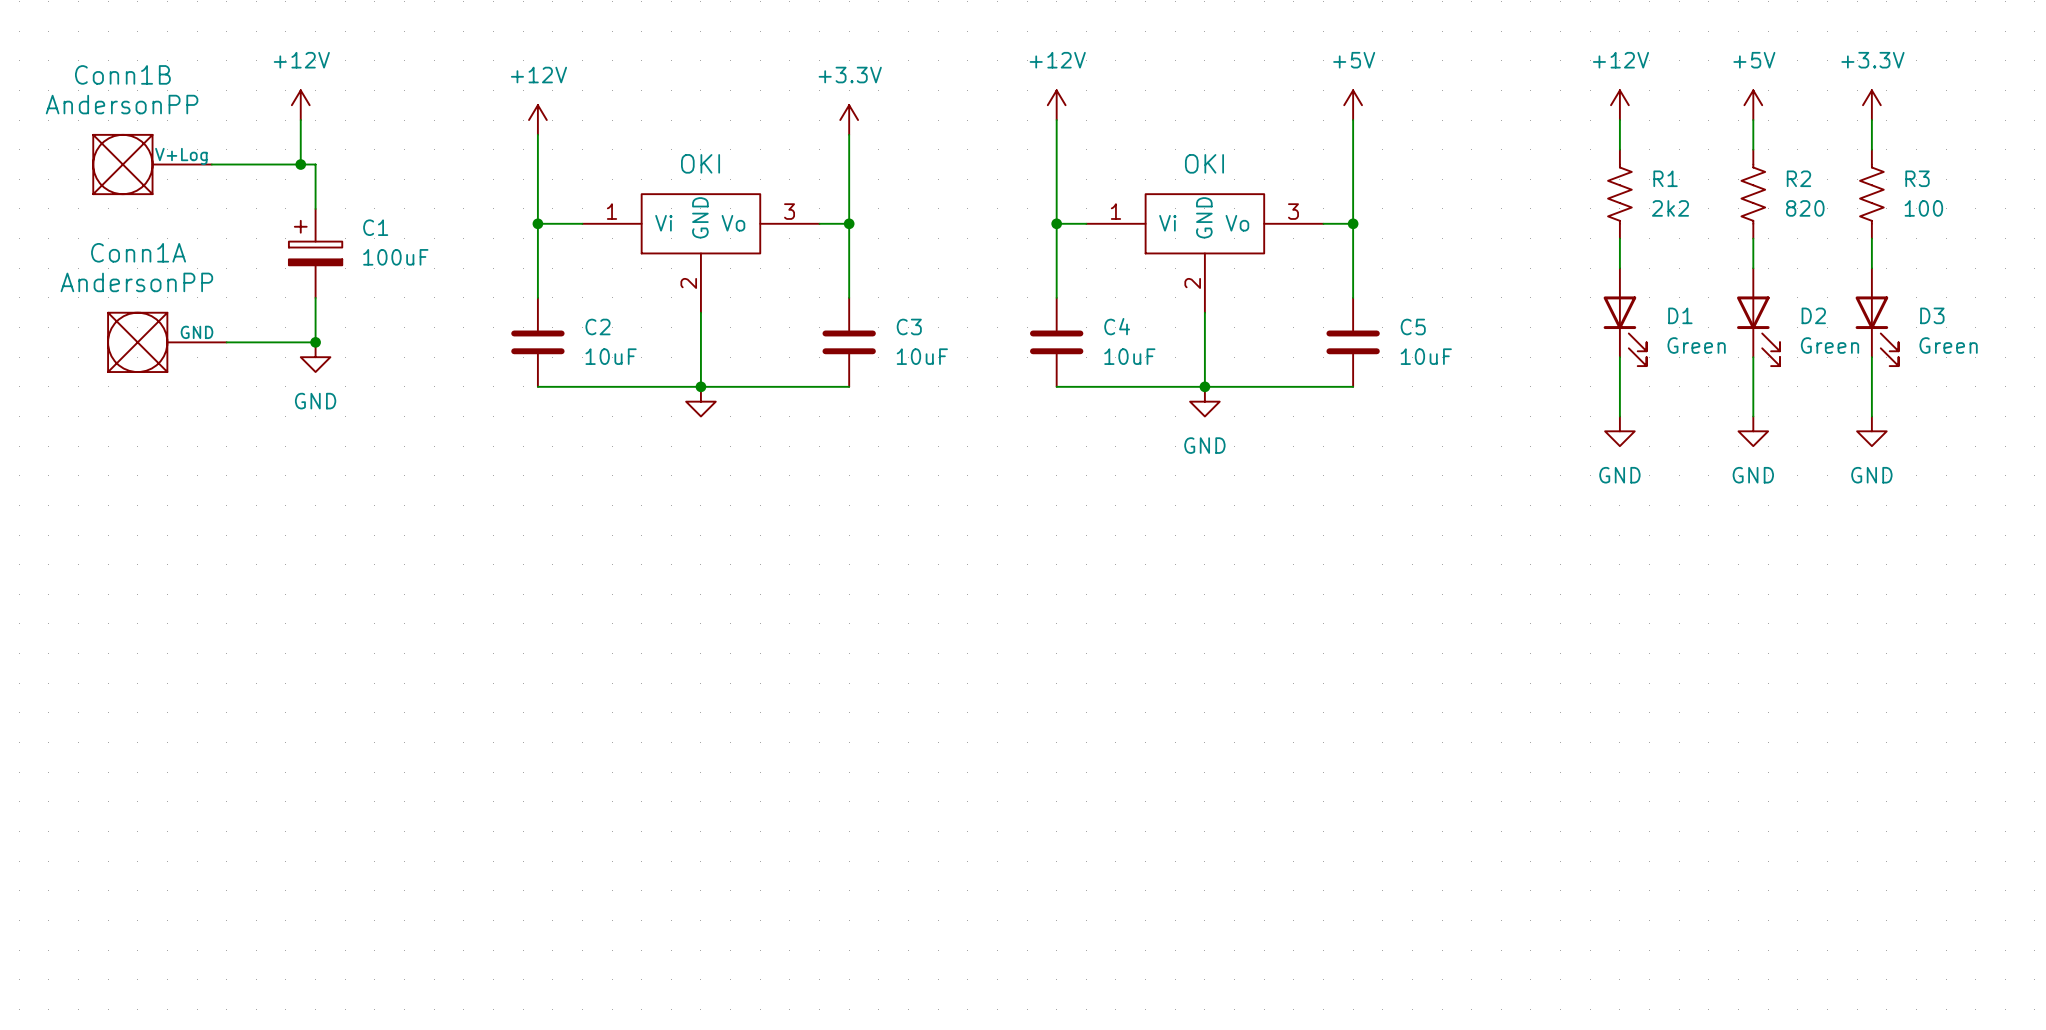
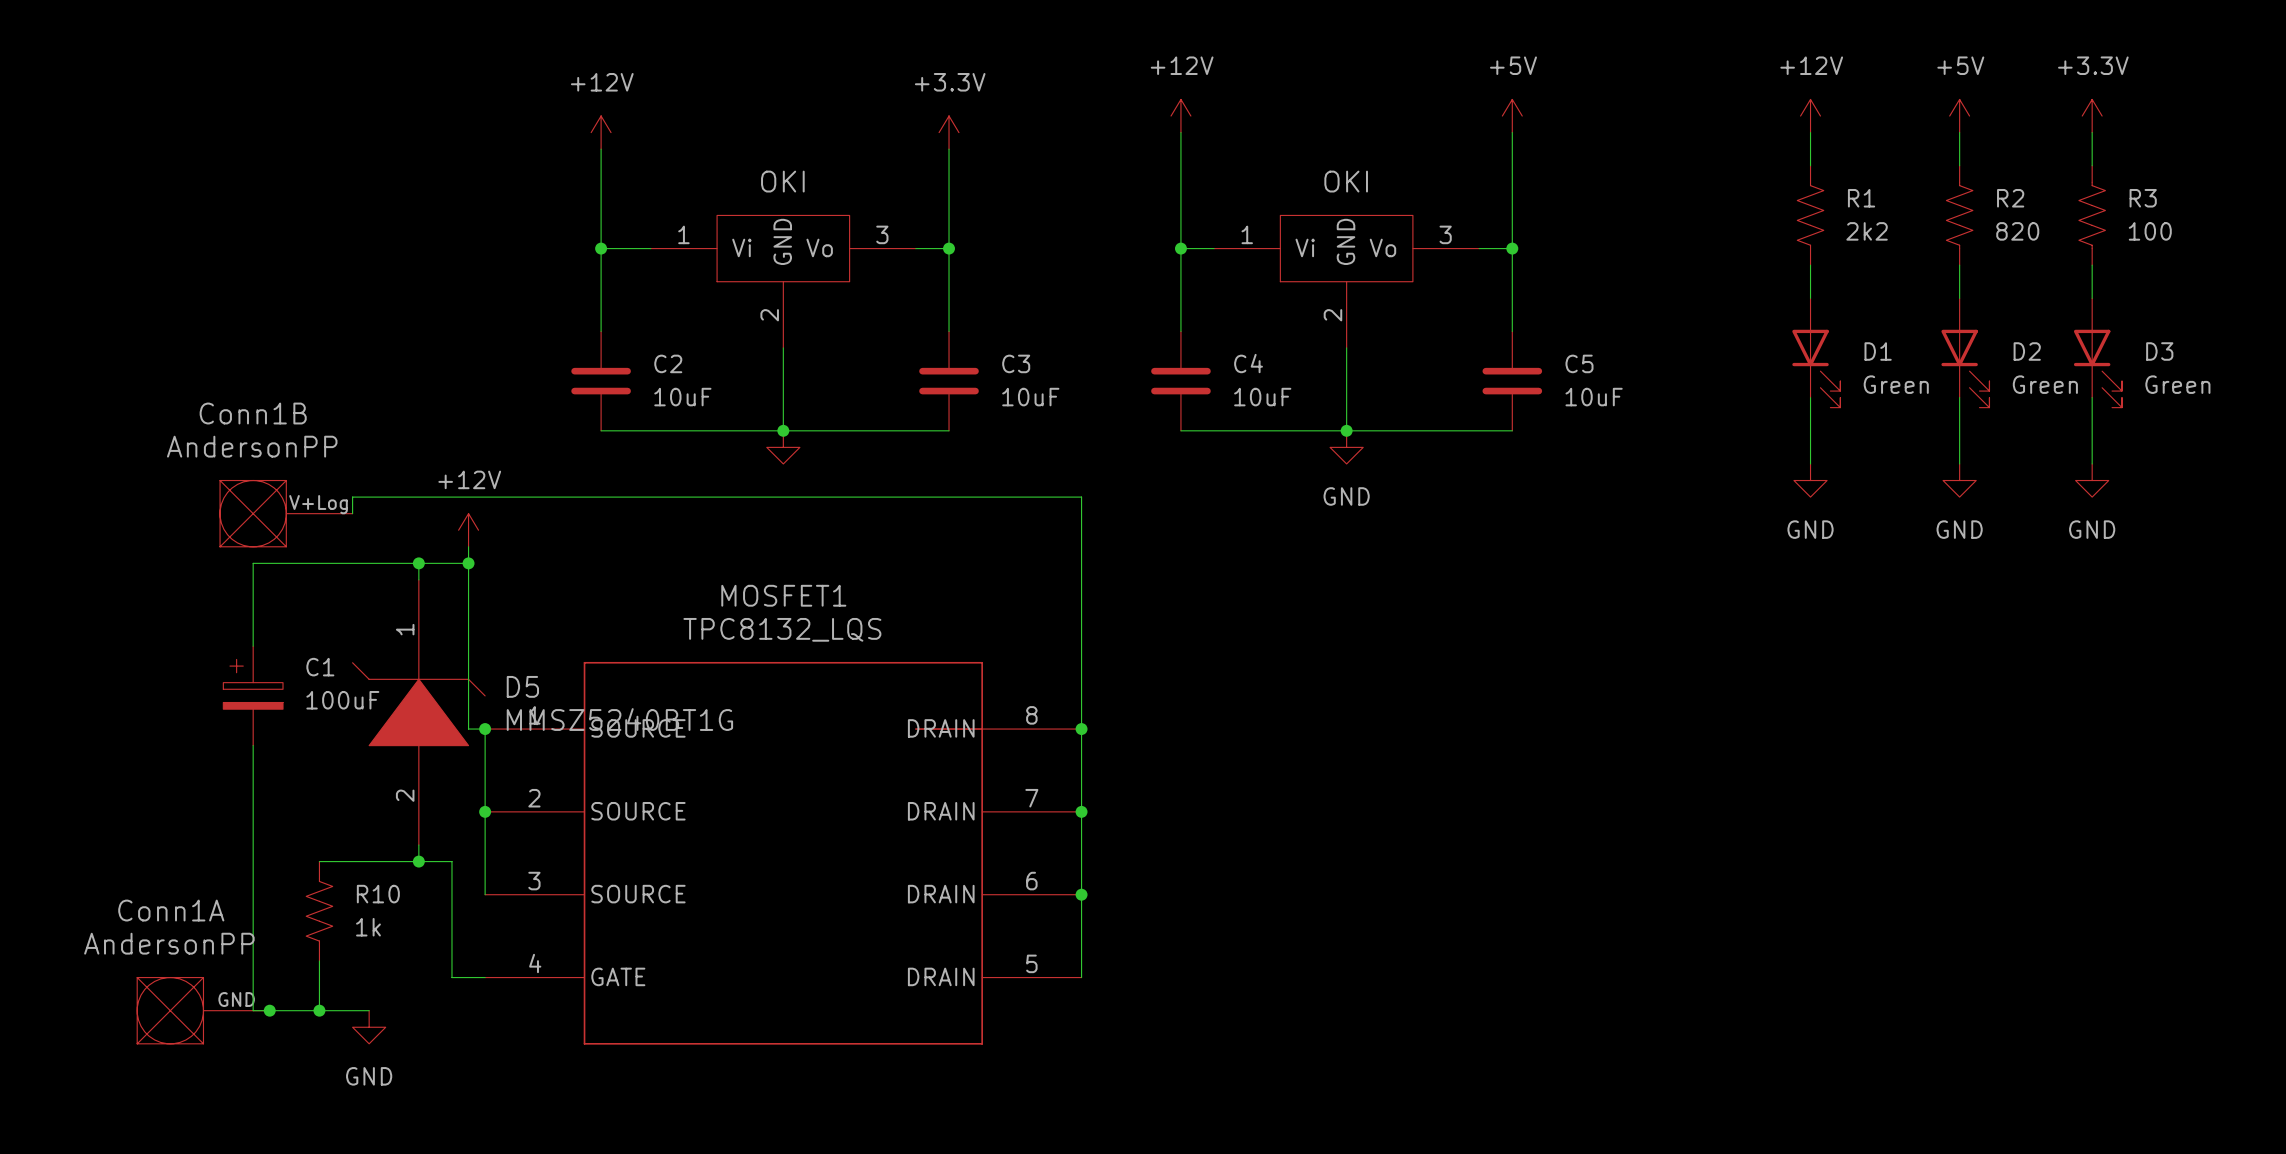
power symbol: +12V (300, 105) -> none
wire: (300, 120) (300, 164) -> none
Conn1B position: (152, 164) -> (286, 513)
wire: (211, 164) (315, 164) (315, 208) -> none
junction: (300, 164) -> none
C1 position: (315, 253) -> (253, 695)
wire: (315, 297) (315, 342) (226, 342) -> none
Conn1A position: (167, 342) -> (203, 1010)
junction: (315, 342) -> none
power symbol: GND (315, 357) -> none
wire: none -> (352, 513) (352, 497) (1081, 497) (1081, 977)
power symbol: none -> +12V (468, 530)
wire: none -> (468, 546) (468, 729) (485, 729) (485, 894)
wire: none -> (418, 563) (418, 579)
junction: none -> (418, 563)
wire: none -> (468, 563) (253, 563) (253, 646)
junction: none -> (468, 563)
D5: none -> MMSZ5240BT1G (418, 712)
junction: none -> (485, 729)
junction: none -> (1081, 729)
wire: none -> (253, 745) (253, 1010) (369, 1010)
junction: none -> (485, 811)
junction: none -> (1081, 811)
wire: none -> (418, 845) (418, 861)
MOSFET1: none -> TPC8132_LQS (783, 853)
wire: none -> (319, 861) (451, 861) (451, 977) (485, 977)
junction: none -> (418, 861)
junction: none -> (1081, 894)
R10: none -> 1k (319, 911)
wire: none -> (319, 960) (319, 1010)
junction: none -> (269, 1010)
junction: none -> (319, 1010)
power symbol: none -> GND (369, 1027)

